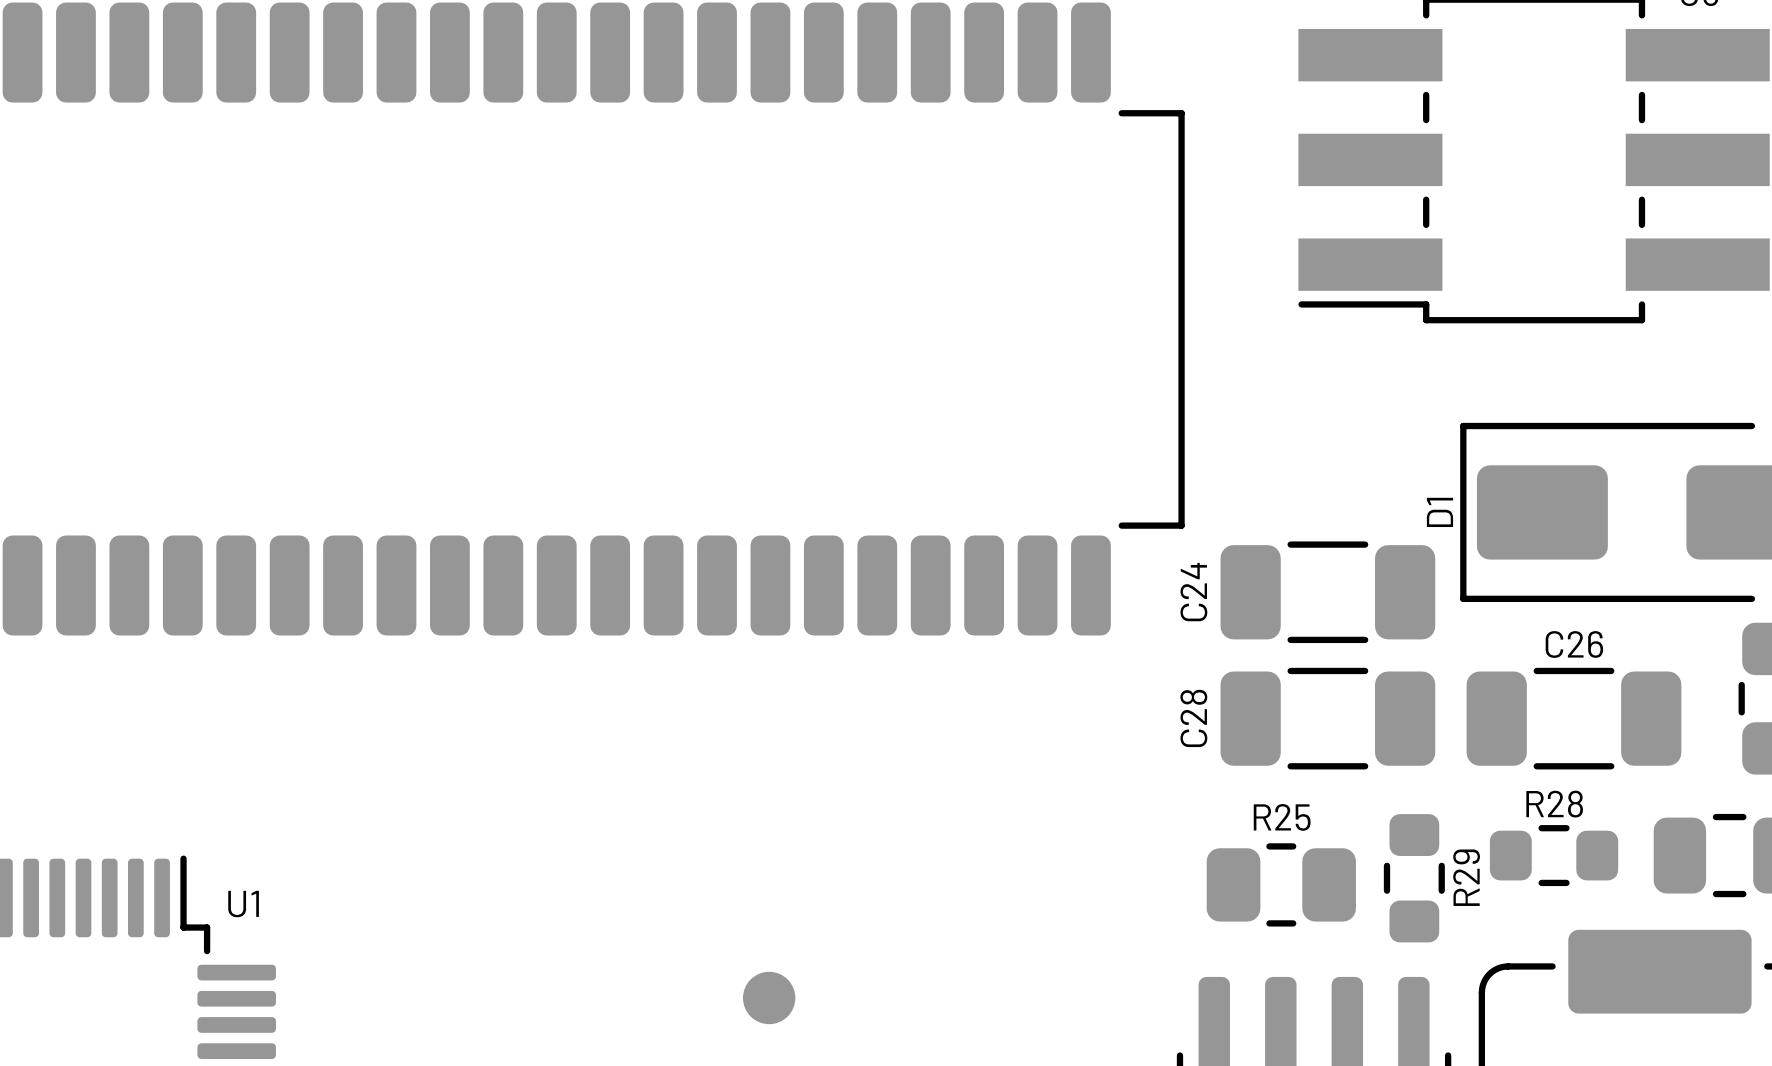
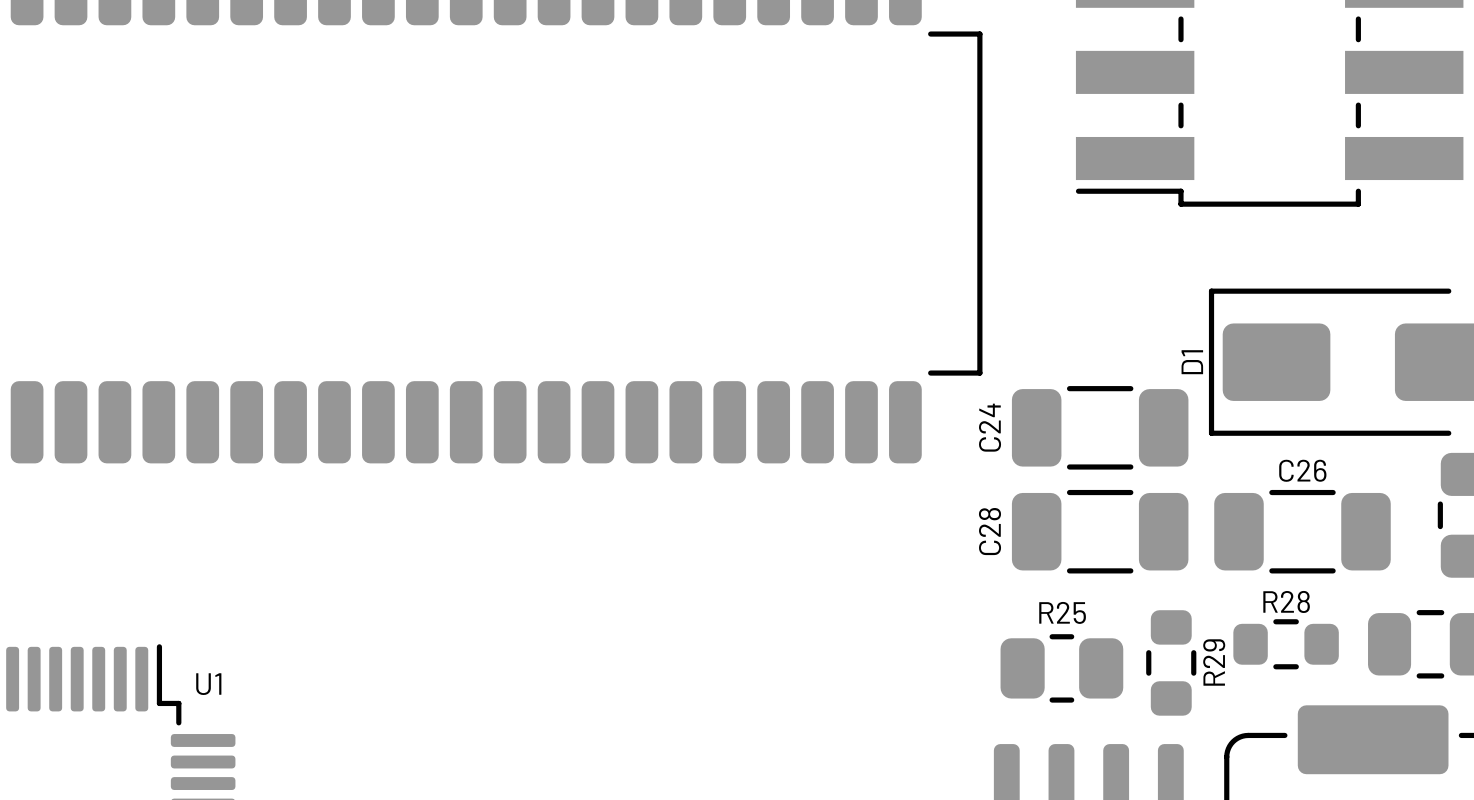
part: (769, 997) -> none

